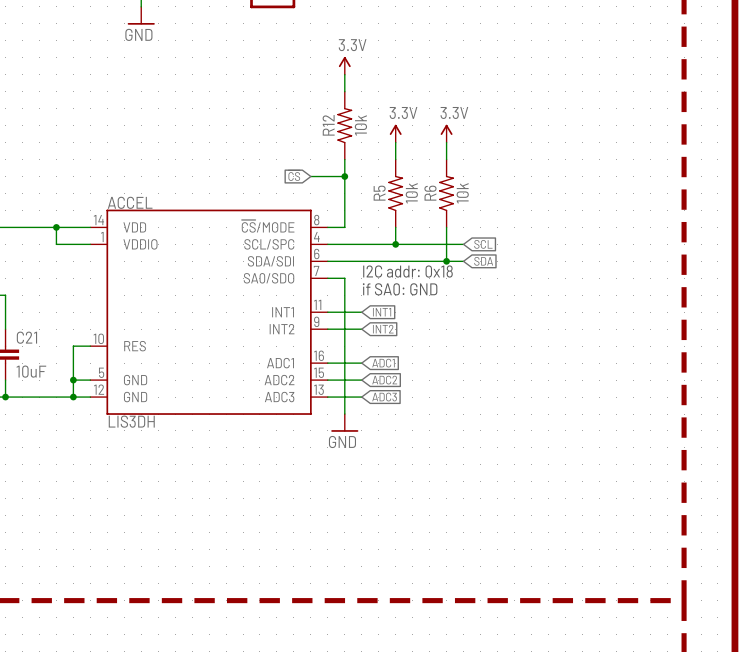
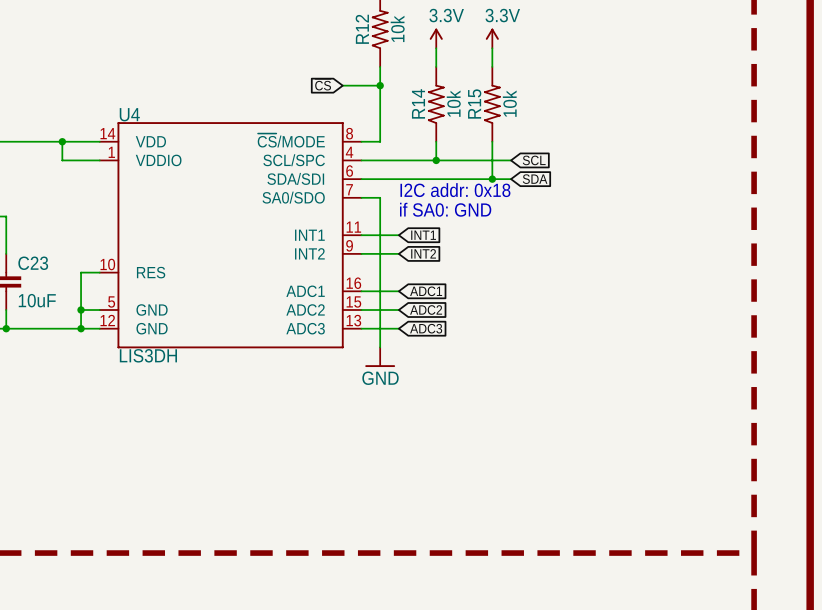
R5 name: R5 (379, 193) -> R14 (418, 103)
R6 name: R6 (430, 193) -> R15 (474, 104)
ACCEL name: ACCEL (130, 202) -> U4 (129, 114)
C21 name: C21 (26, 337) -> C23 (33, 263)

